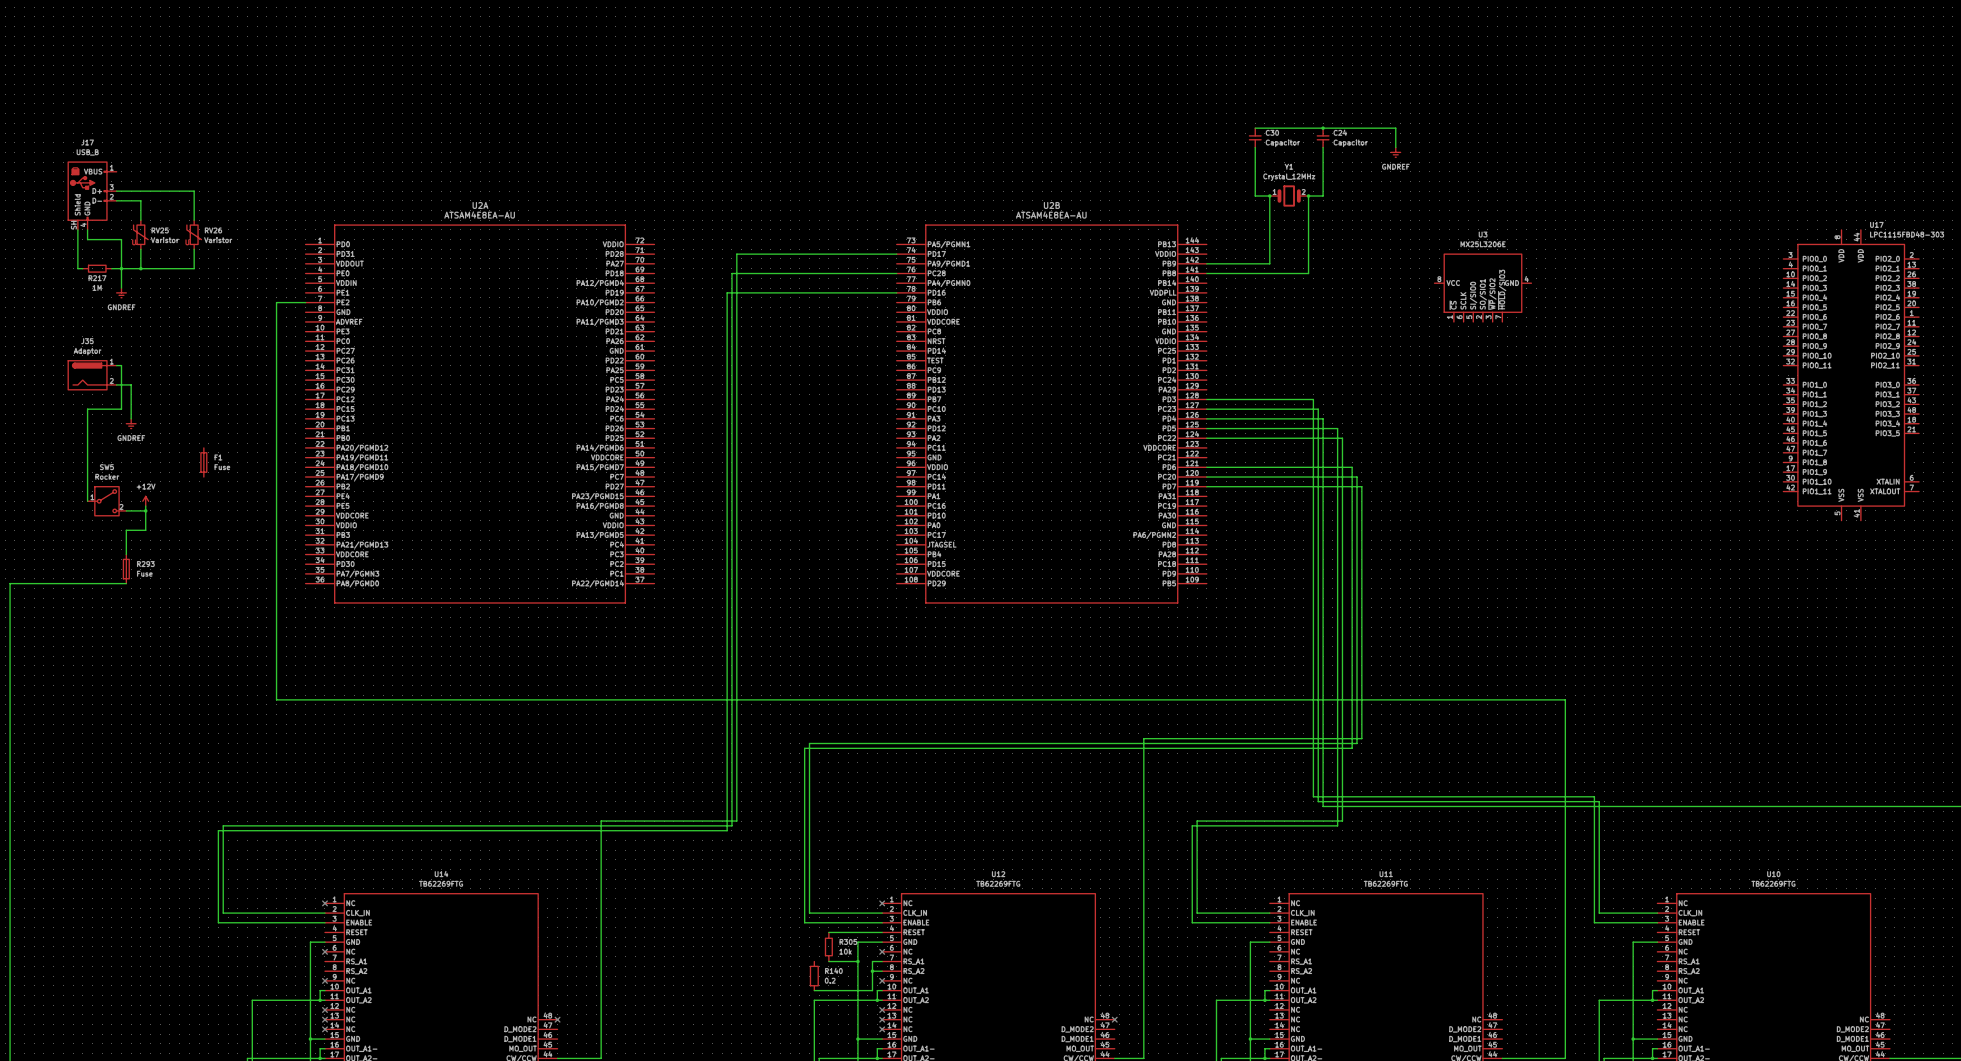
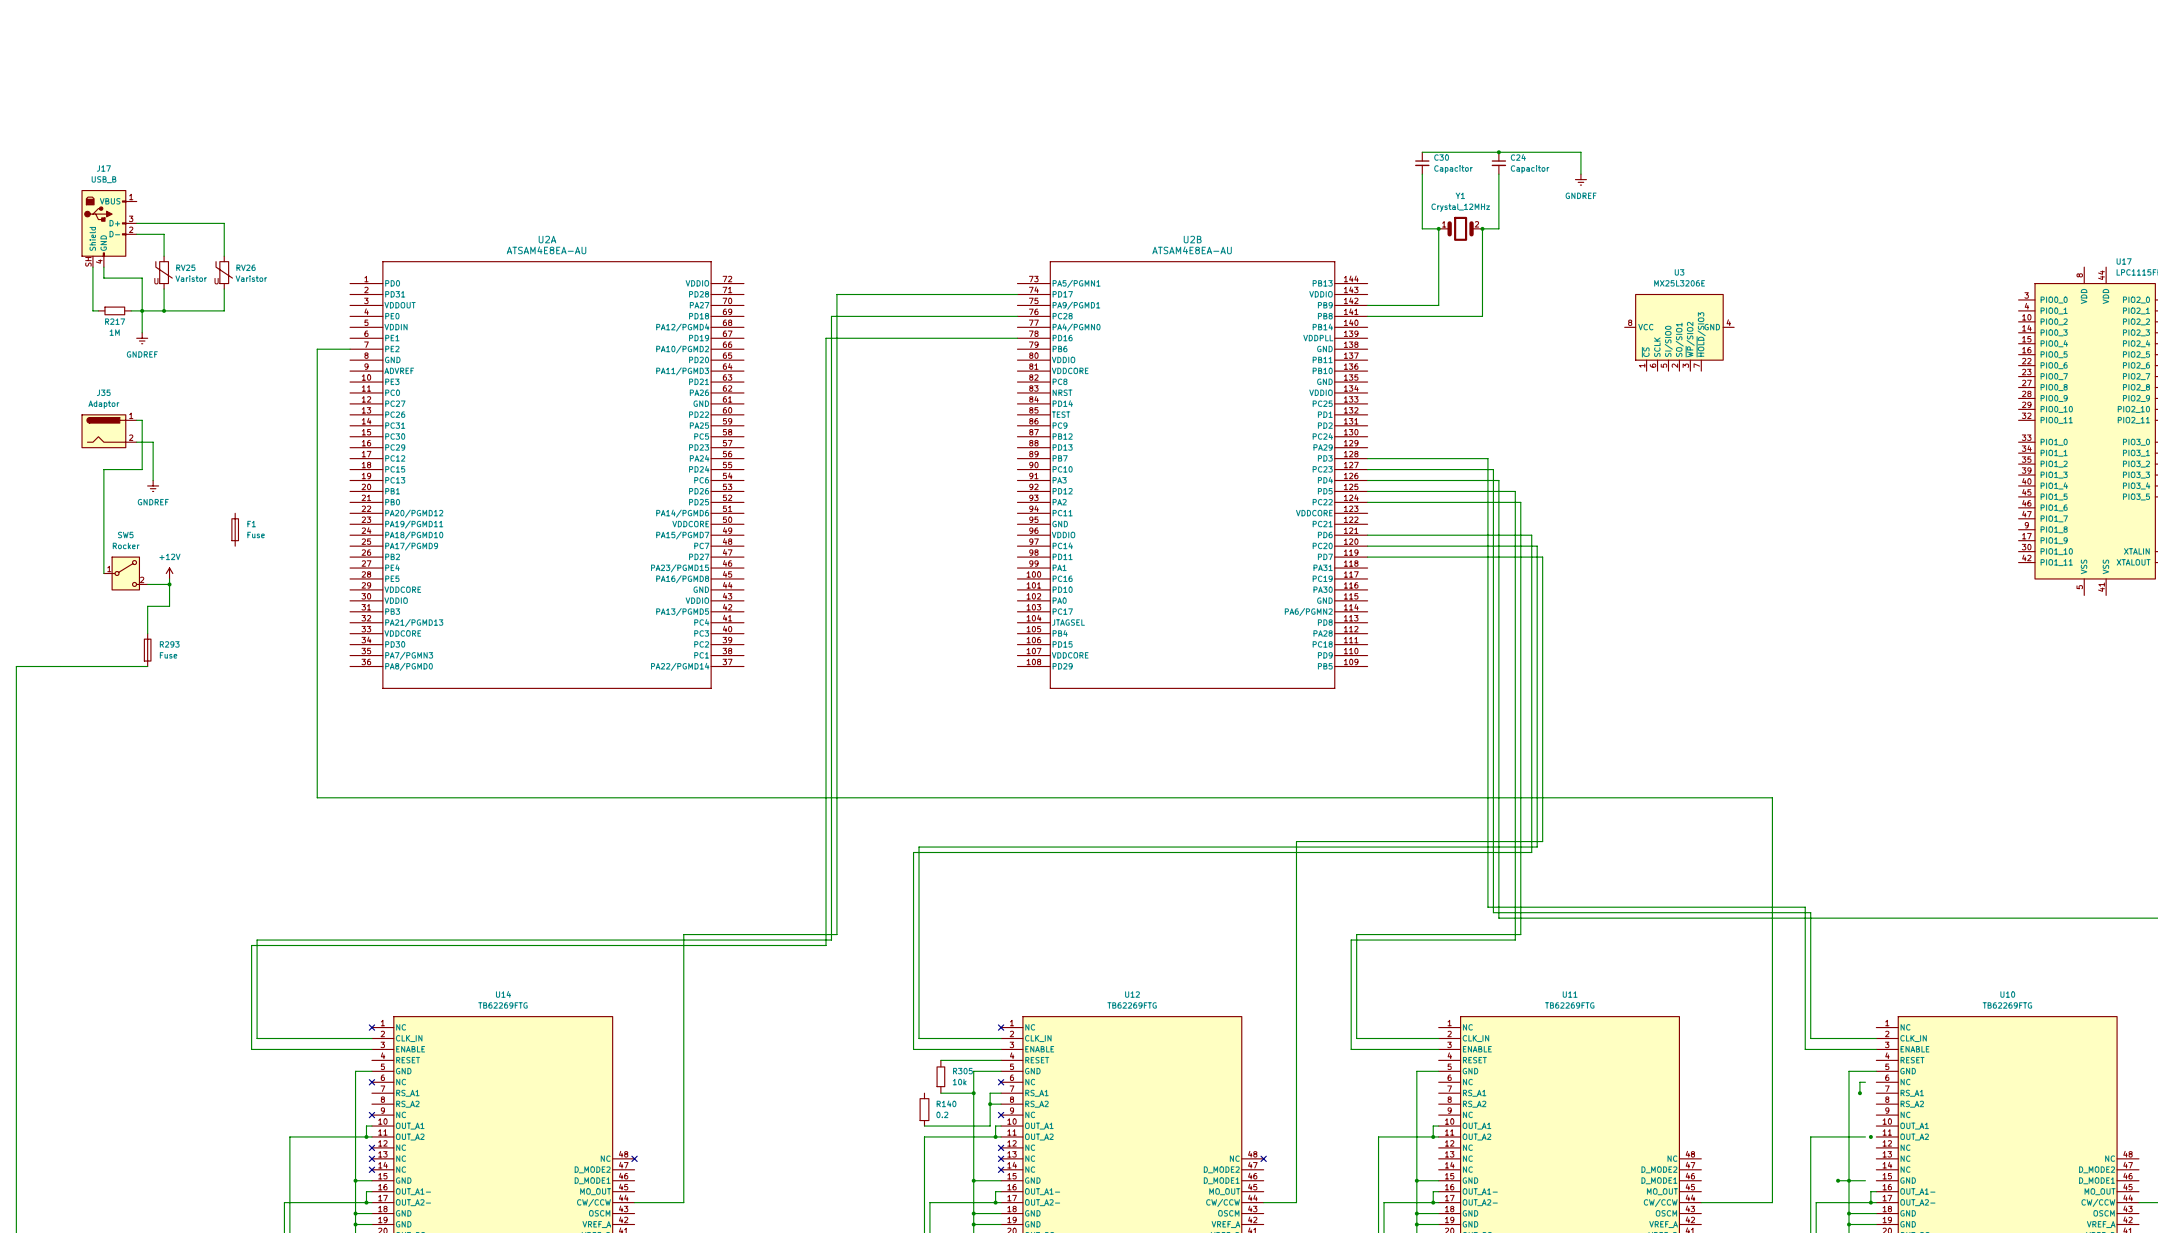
junction: none -> (1859, 1093)
wire: (1657, 990) (1652, 990) (1652, 1000) -> (1865, 1082) (1859, 1082) (1859, 1093)
wire: (1647, 1000) (1657, 1000) -> none
junction: none -> (1838, 1180)
wire: (1647, 1039) (1657, 1039) -> (1838, 1180) (1849, 1180)

